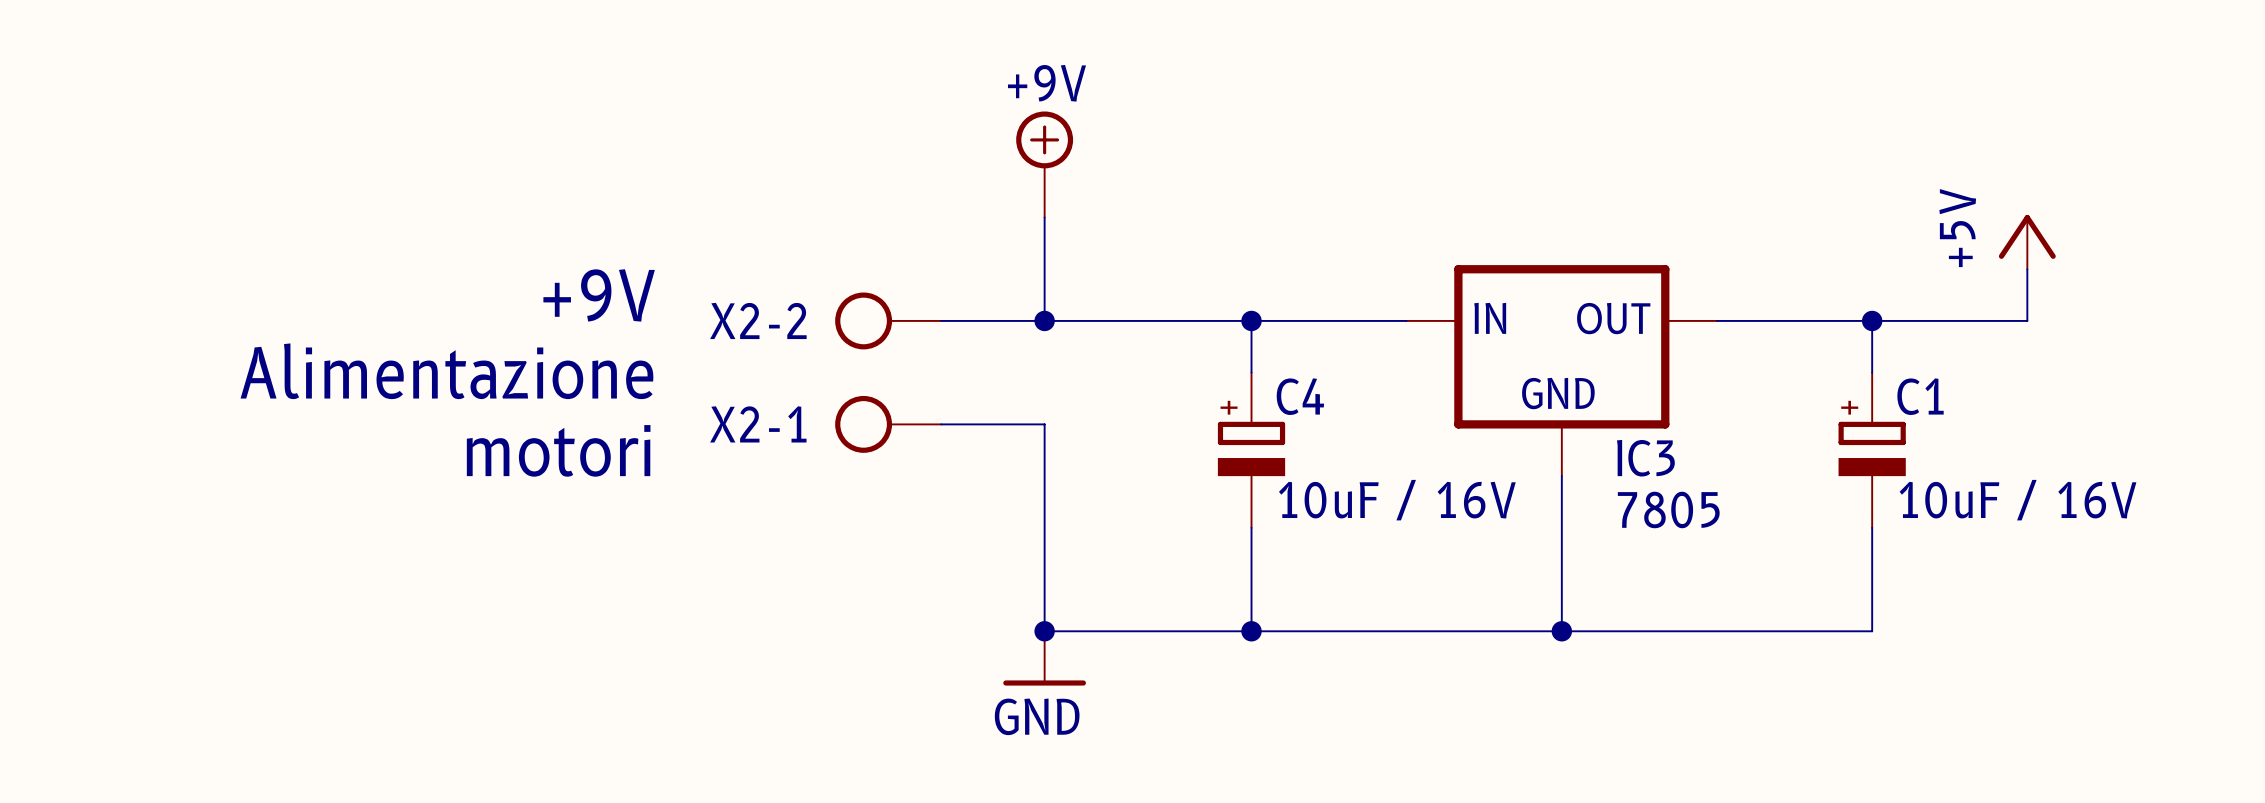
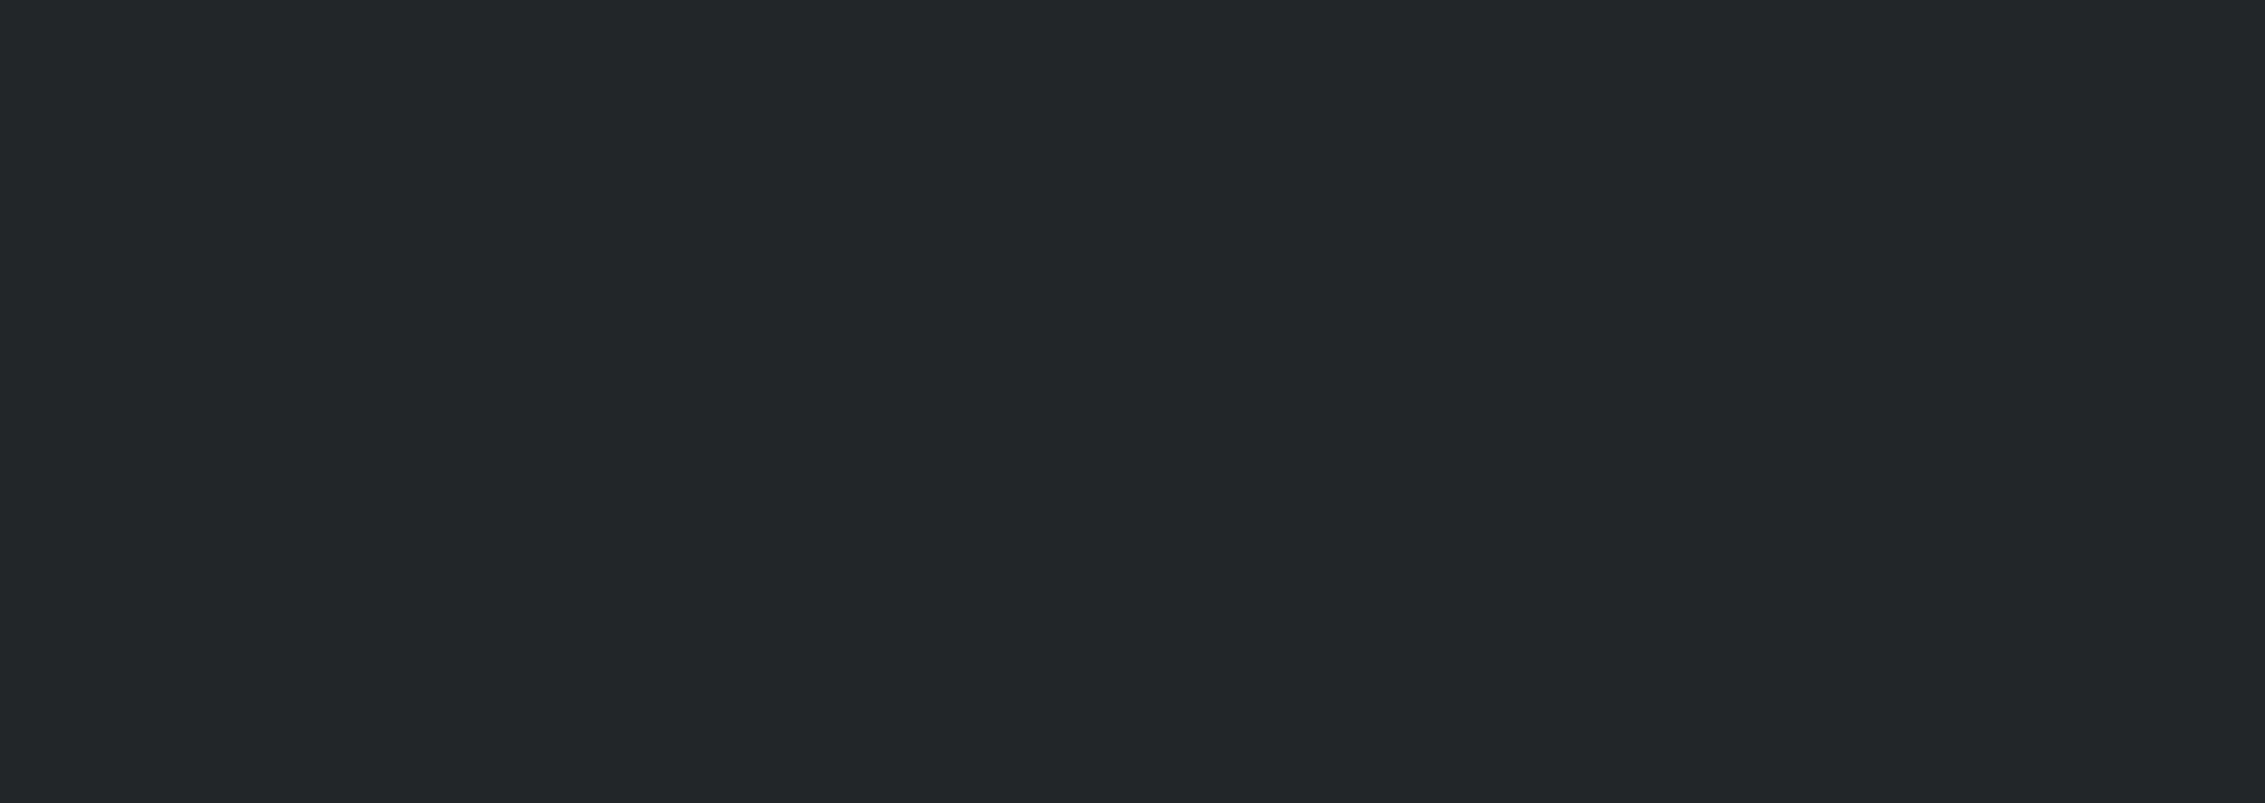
power symbol: +9V (1044, 164) -> none
wire: (1044, 217) (1044, 320) -> none
power symbol: +5V (2027, 242) -> none
wire: (2027, 269) (2027, 320) (1717, 320) -> none
text: +9V (599, 295) -> none
X2-2: (888, 320) -> none
wire: (941, 320) (1406, 320) -> none
junction: (1044, 320) -> none
wire: (1251, 320) (1251, 372) -> none
junction: (1251, 320) -> none
wire: (1872, 320) (1872, 372) -> none
junction: (1872, 320) -> none
IC3: 7805 (1561, 370) -> none
text: Alimentazione (446, 371) -> none
X2-1: (888, 424) -> none
wire: (941, 424) (1044, 424) (1044, 631) (1872, 631) (1872, 527) -> none
text: motori (558, 450) -> none
C4: 10uF / 16V (1251, 450) -> none
C1: 10uF / 16V (1872, 450) -> none
wire: (1561, 476) (1561, 631) -> none
wire: (1251, 527) (1251, 631) -> none
junction: (1044, 631) -> none
junction: (1251, 631) -> none
junction: (1561, 631) -> none
power symbol: GND (1044, 658) -> none

